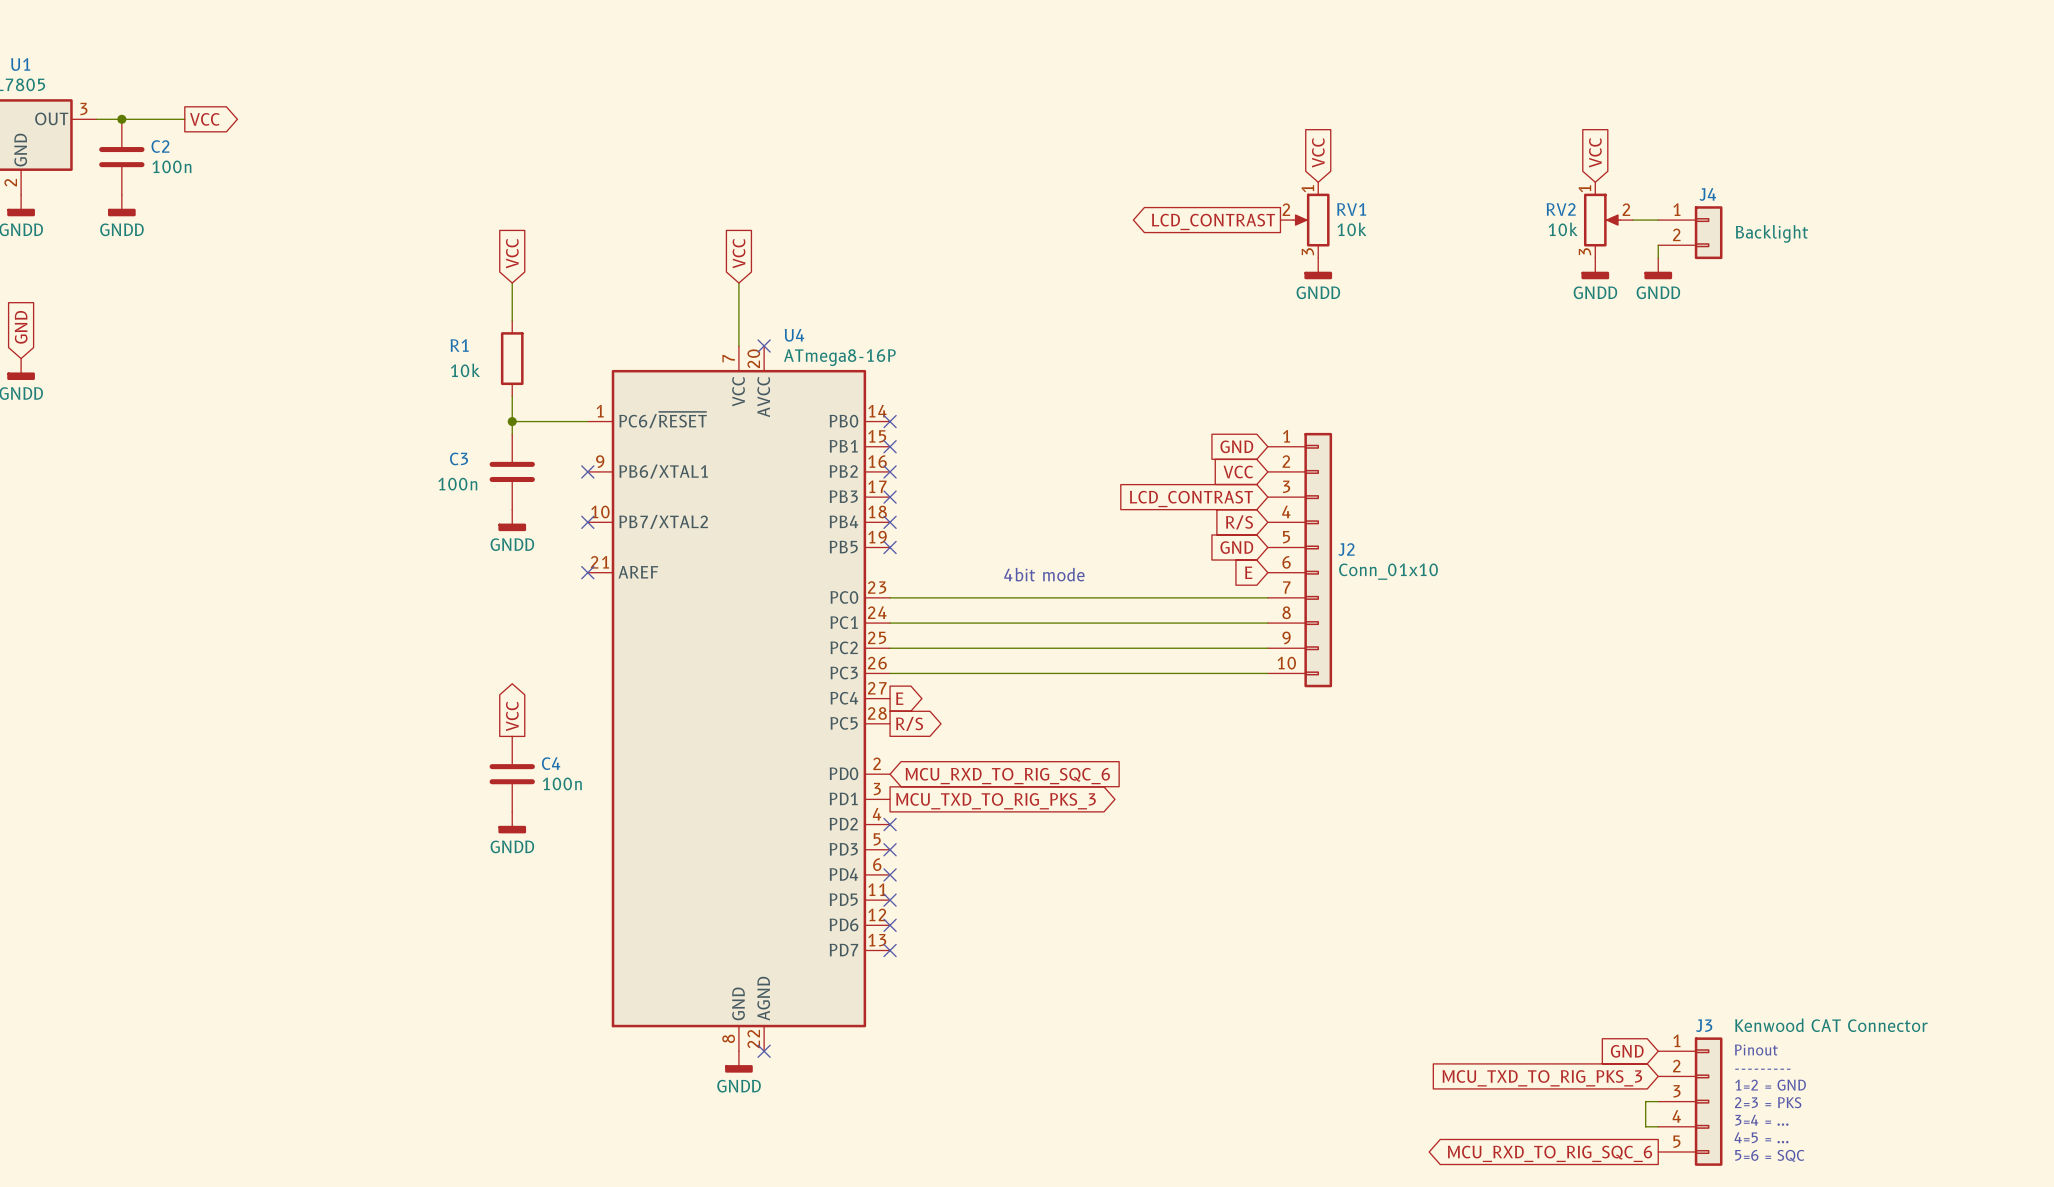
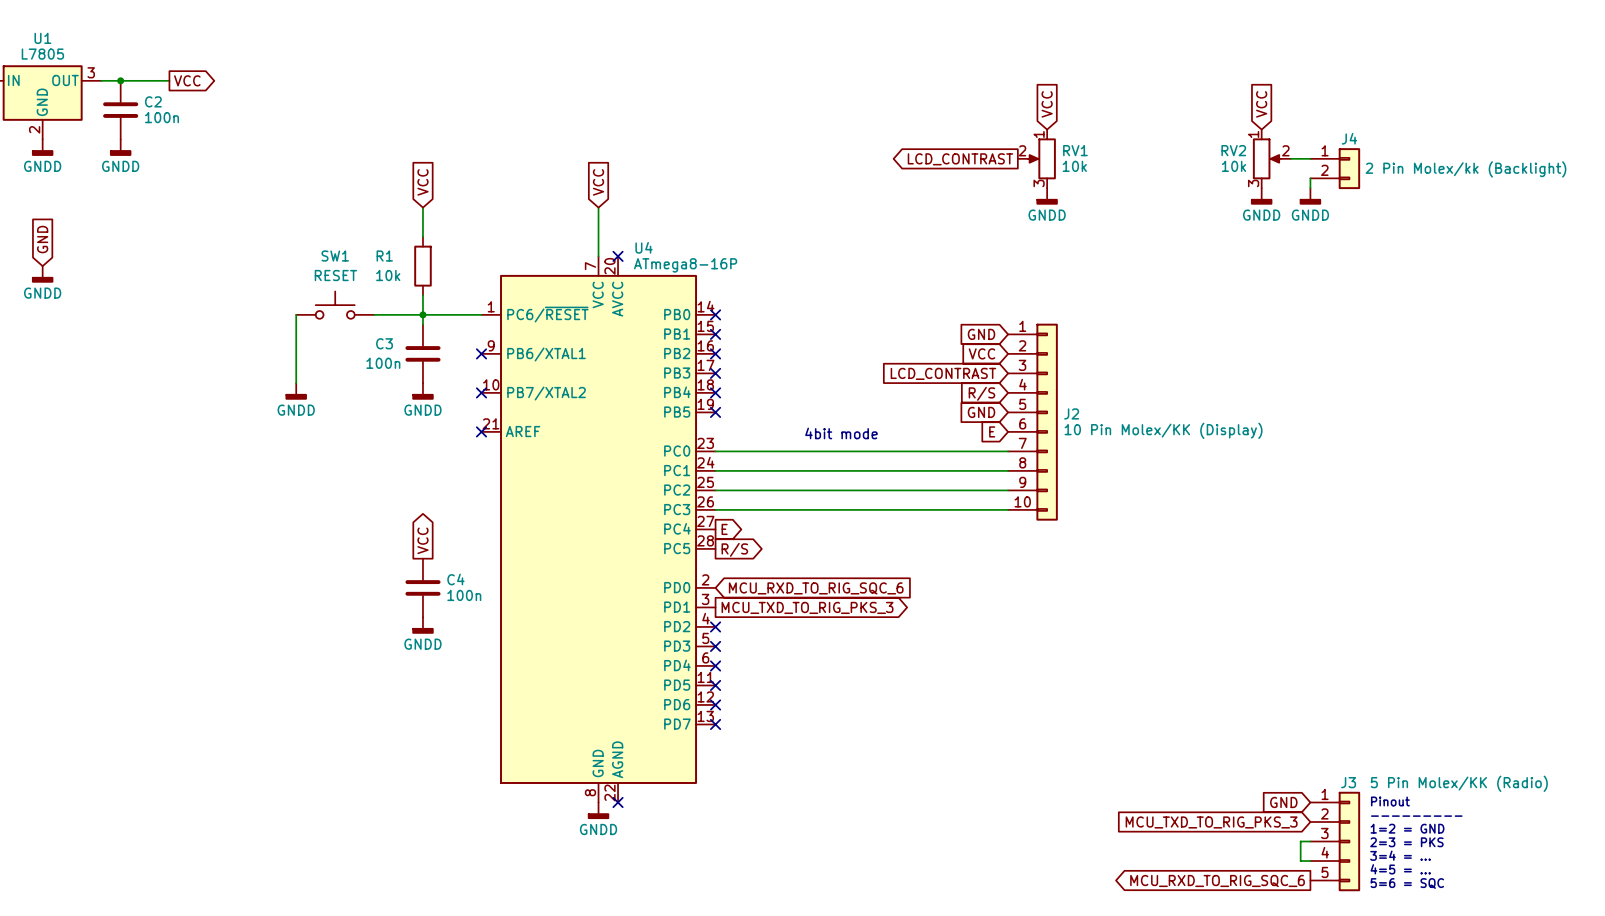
J4 value: Backlight (1771, 233) -> 2 Pin Molex/kk (Backlight) (1465, 169)
SW1: none -> RESET (335, 305)
wire: none -> (296, 314) (296, 383)
wire: none -> (374, 314) (422, 314)
power symbol: none -> GNDD (296, 391)
J2 value: Conn_01x10 (1388, 571) -> 10 Pin Molex/KK (Display) (1163, 430)
J3 value: Kenwood CAT Connector (1831, 1025) -> 5 Pin Molex/KK (Radio) (1459, 783)

